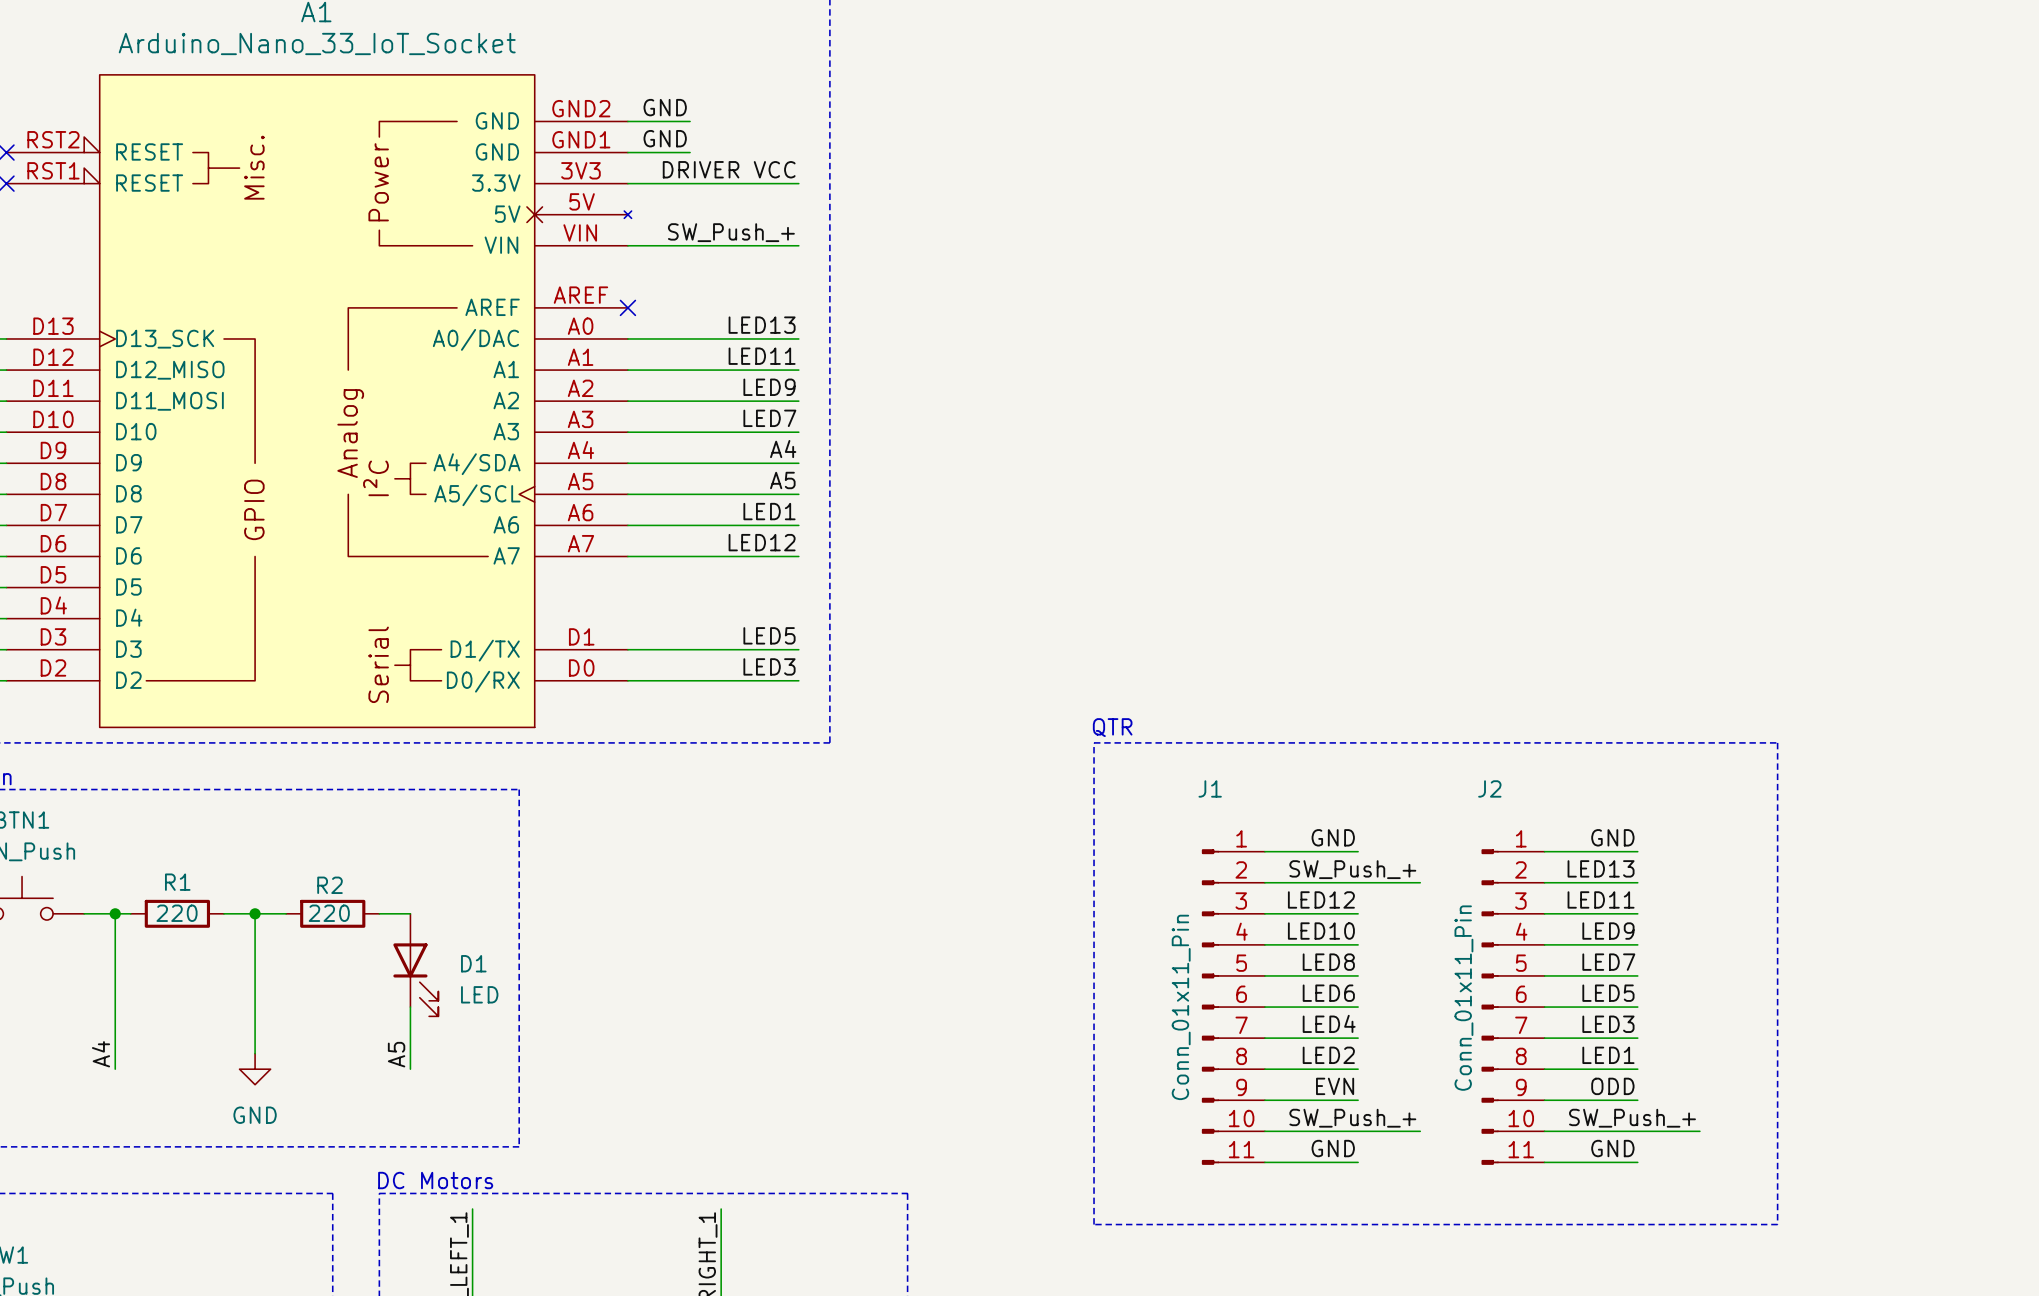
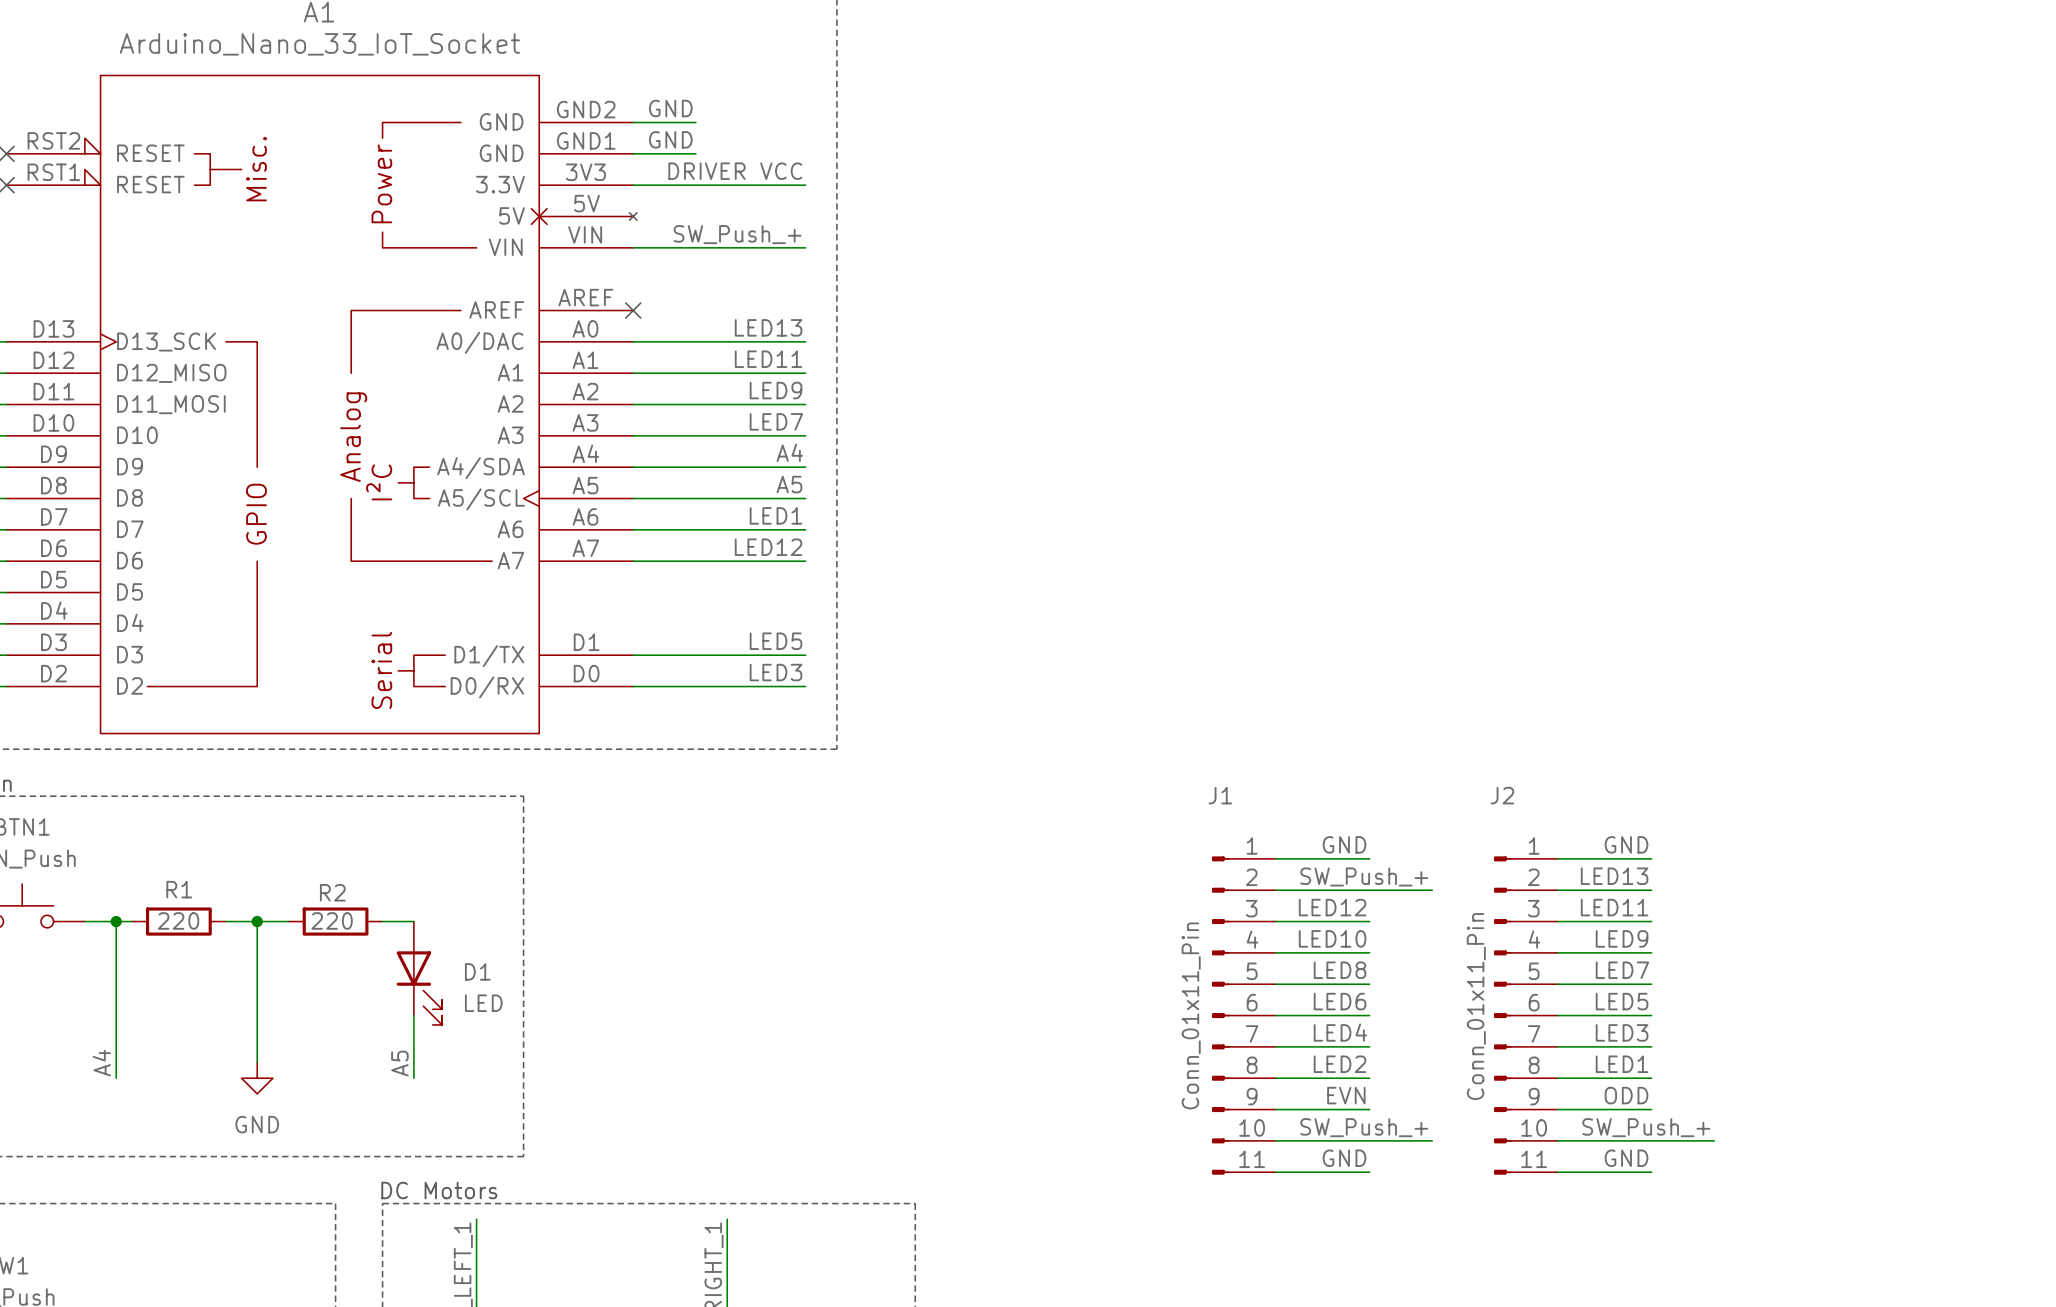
text: QTR (1112, 727) -> none
line: (1094, 742) (1777, 742) (1777, 1224) (1094, 1224) (1094, 742) -> none

